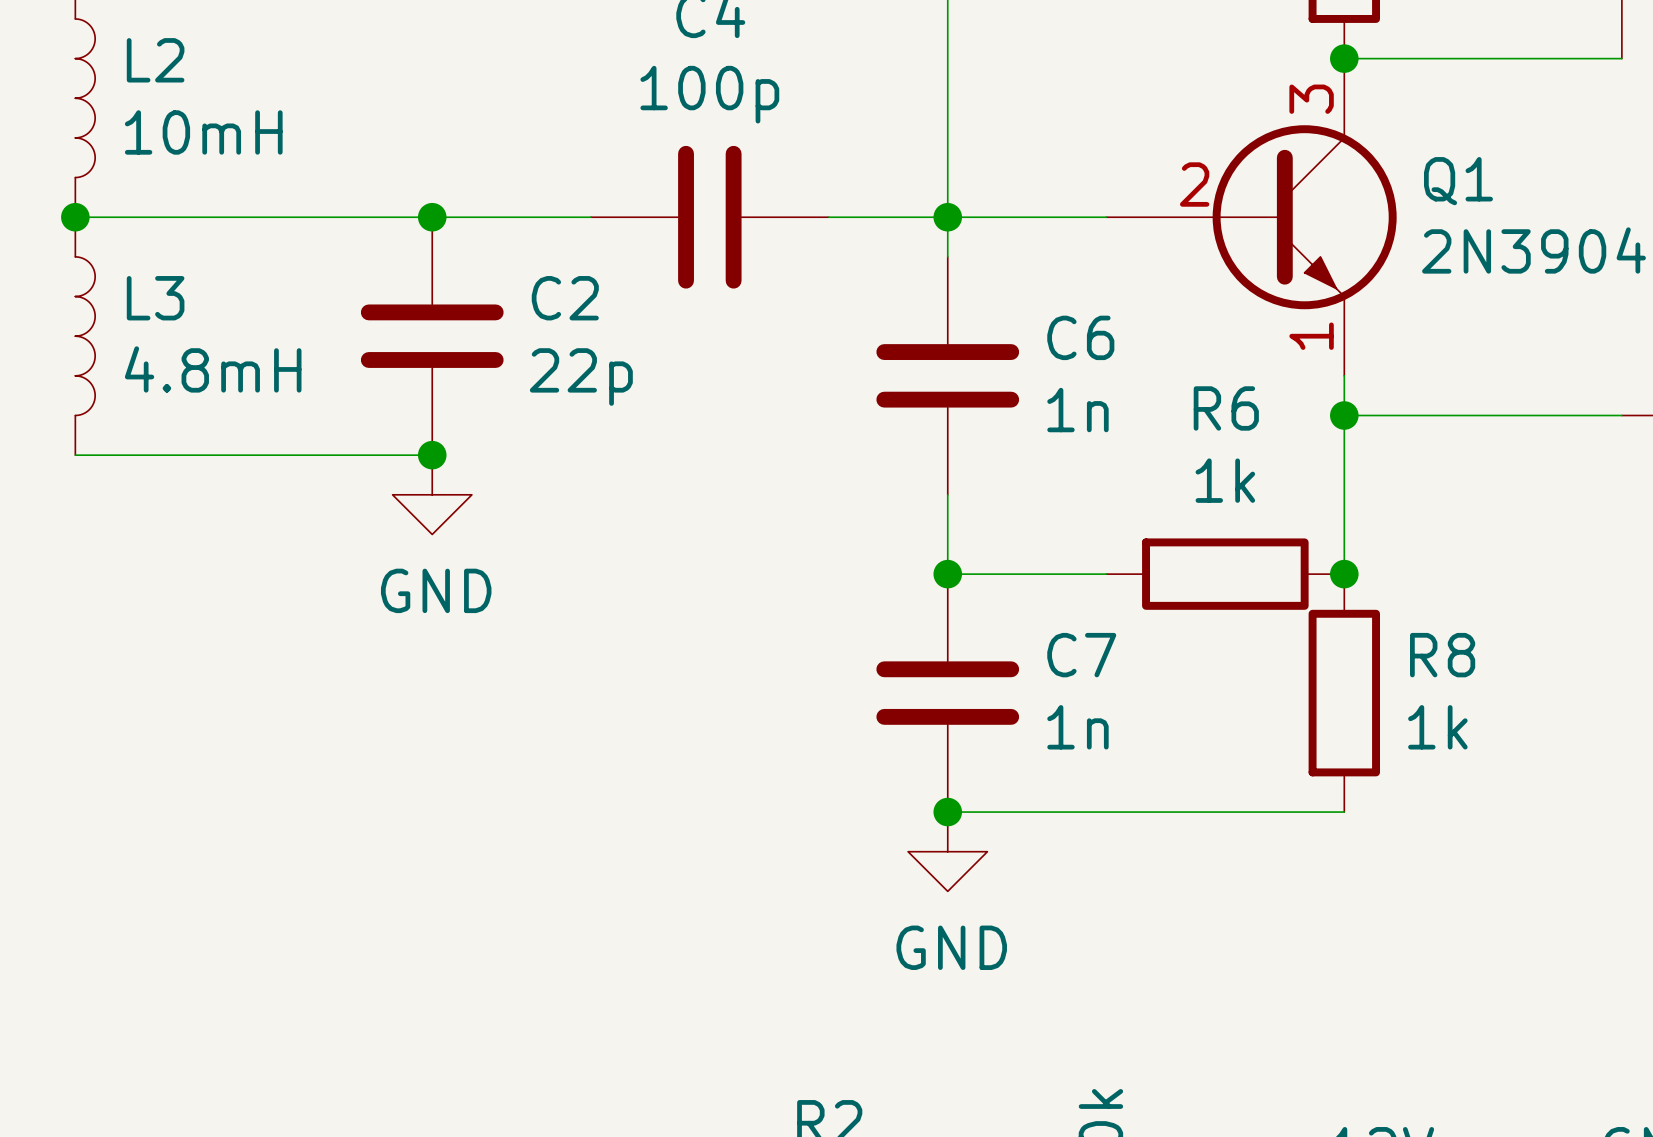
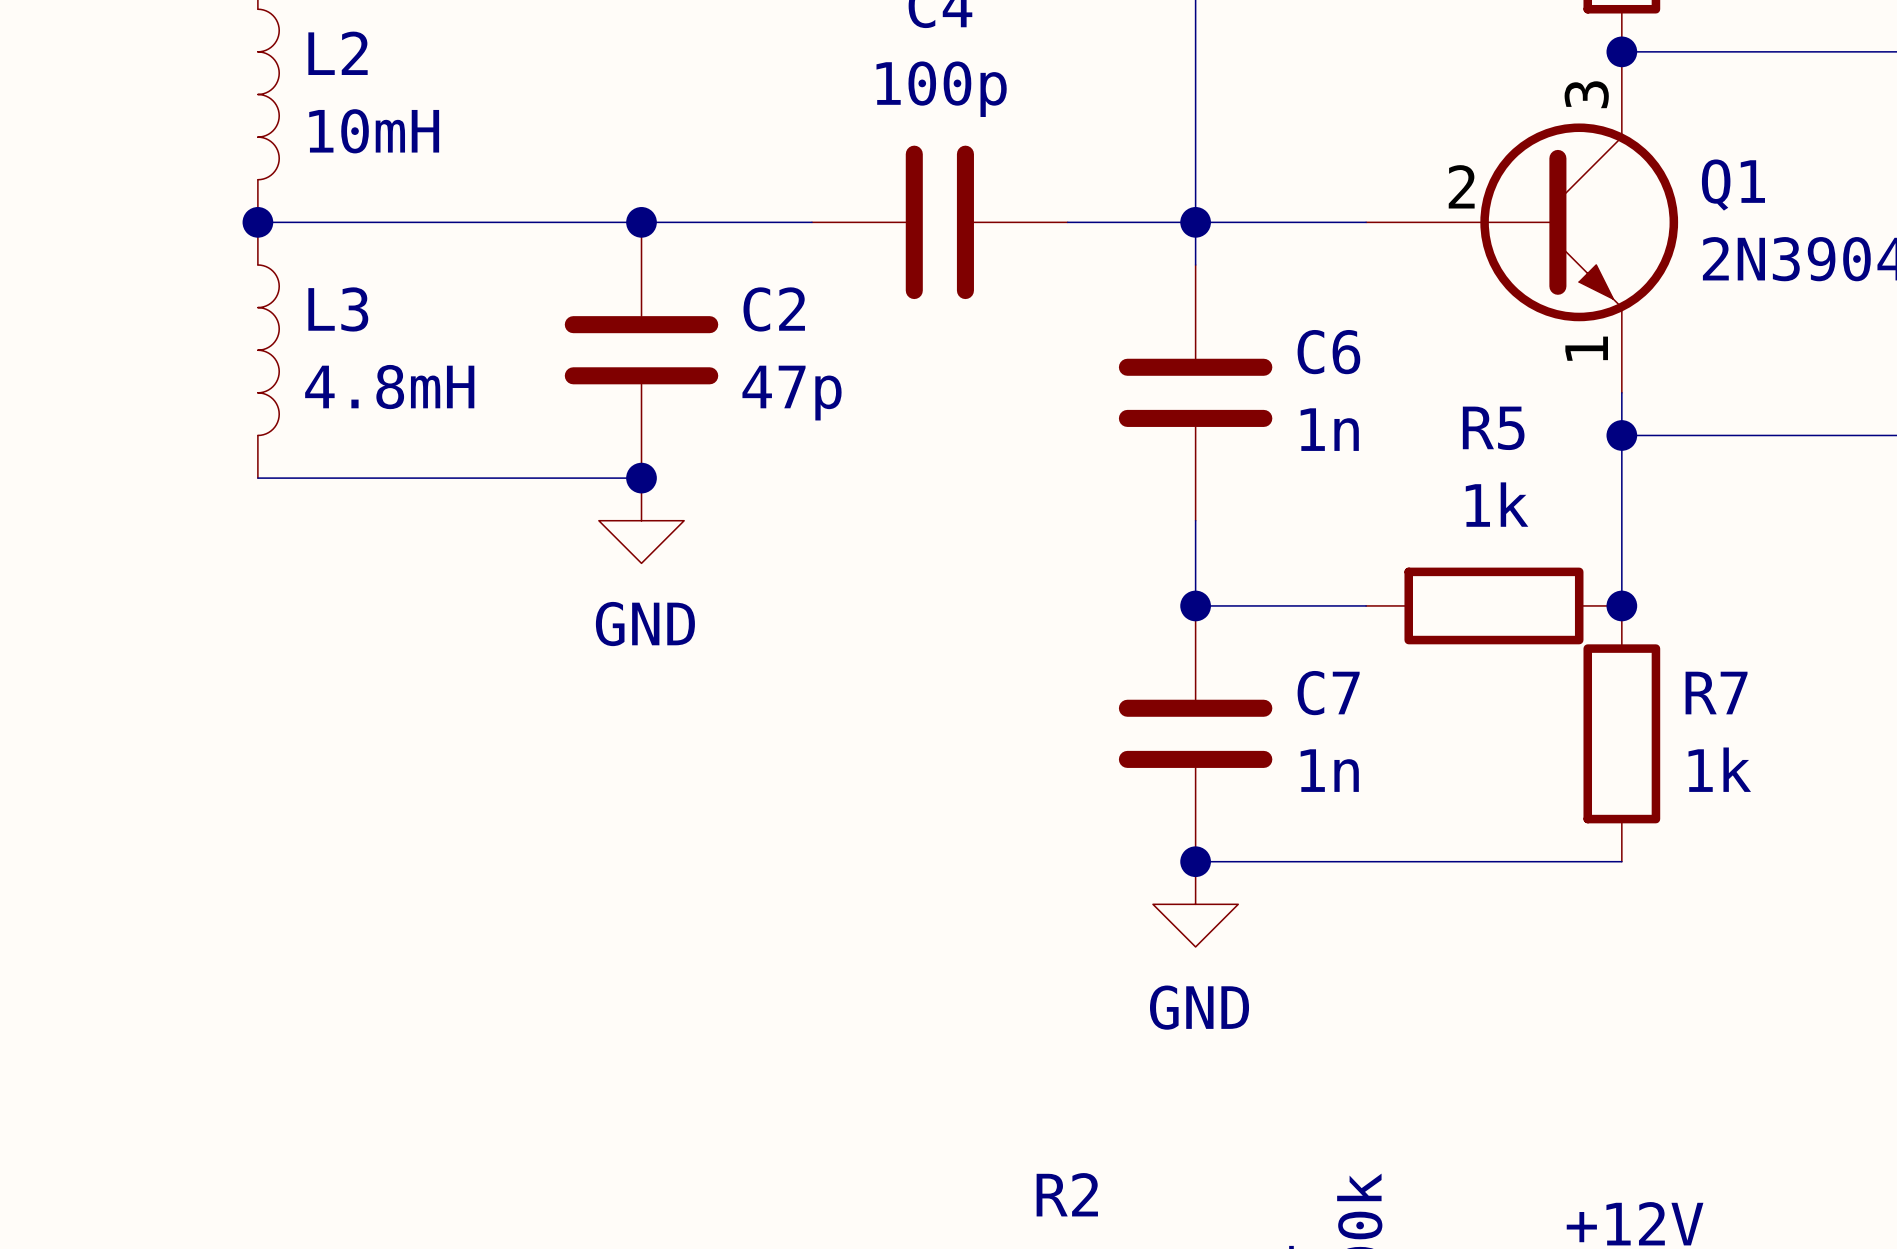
C2 value: 22p (581, 377) -> 47p (792, 393)
R6 name: R6 (1226, 408) -> R5 (1493, 428)
R8 name: R8 (1442, 655) -> R7 (1716, 693)

